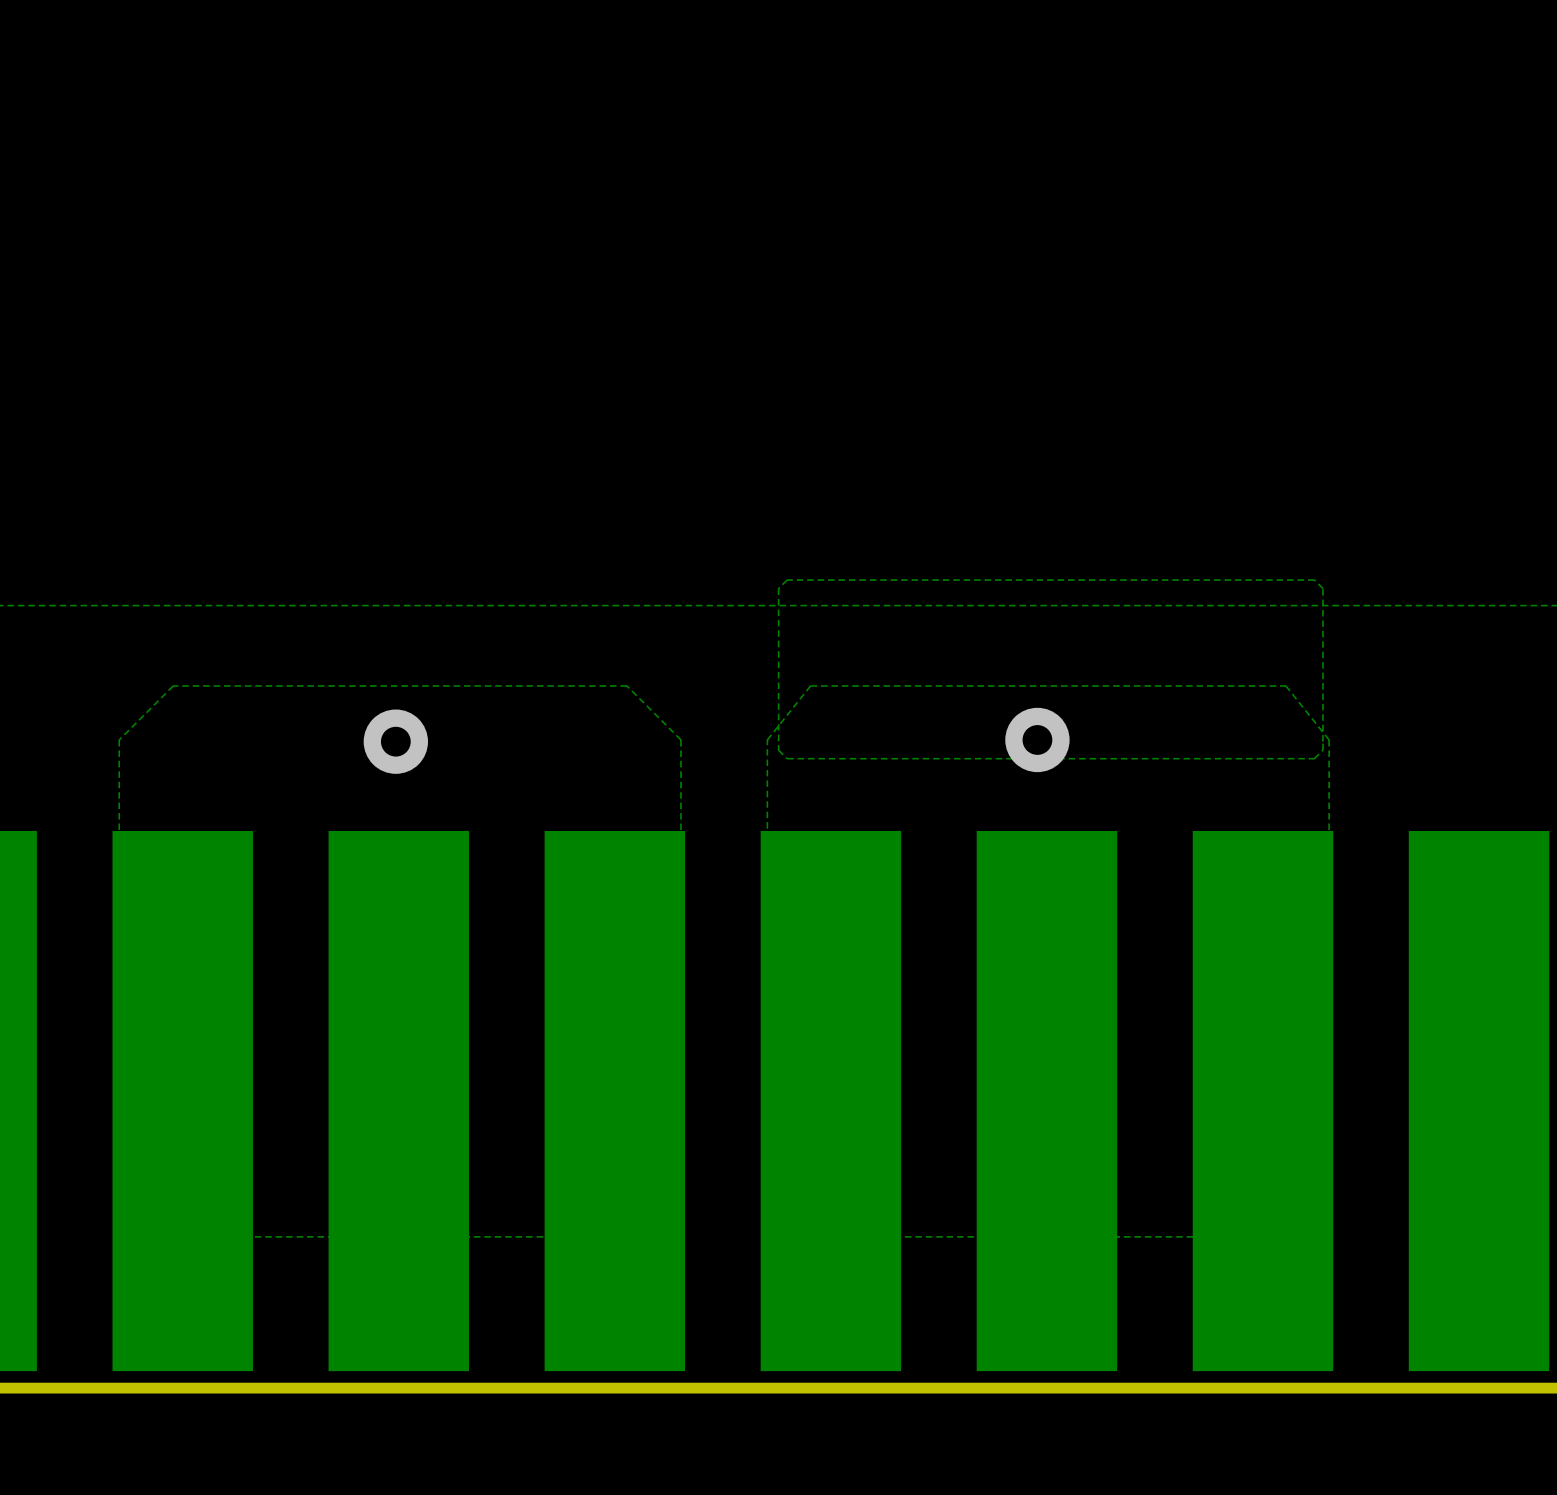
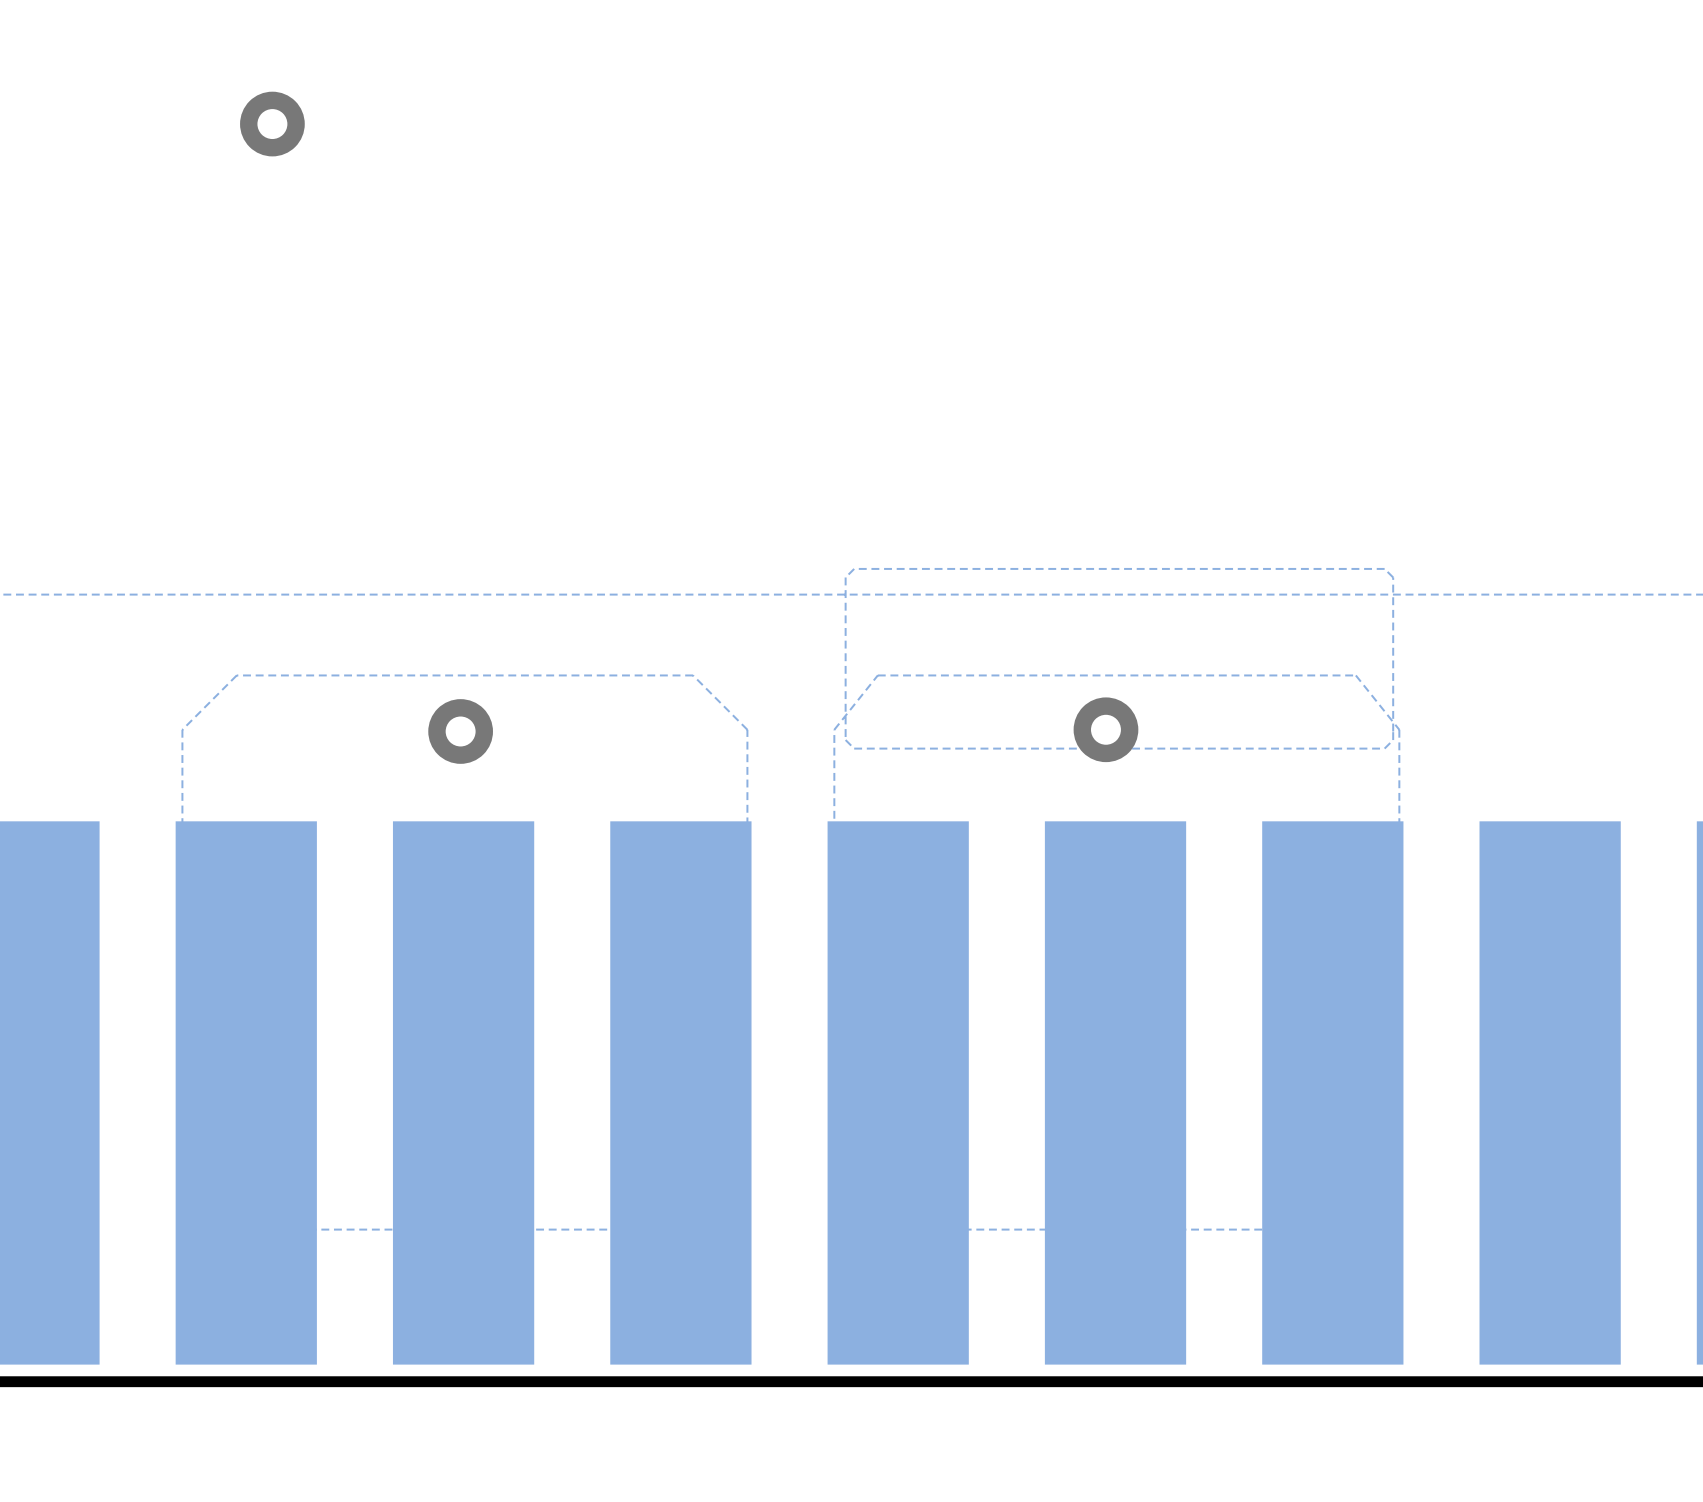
via: none -> (272, 124)

